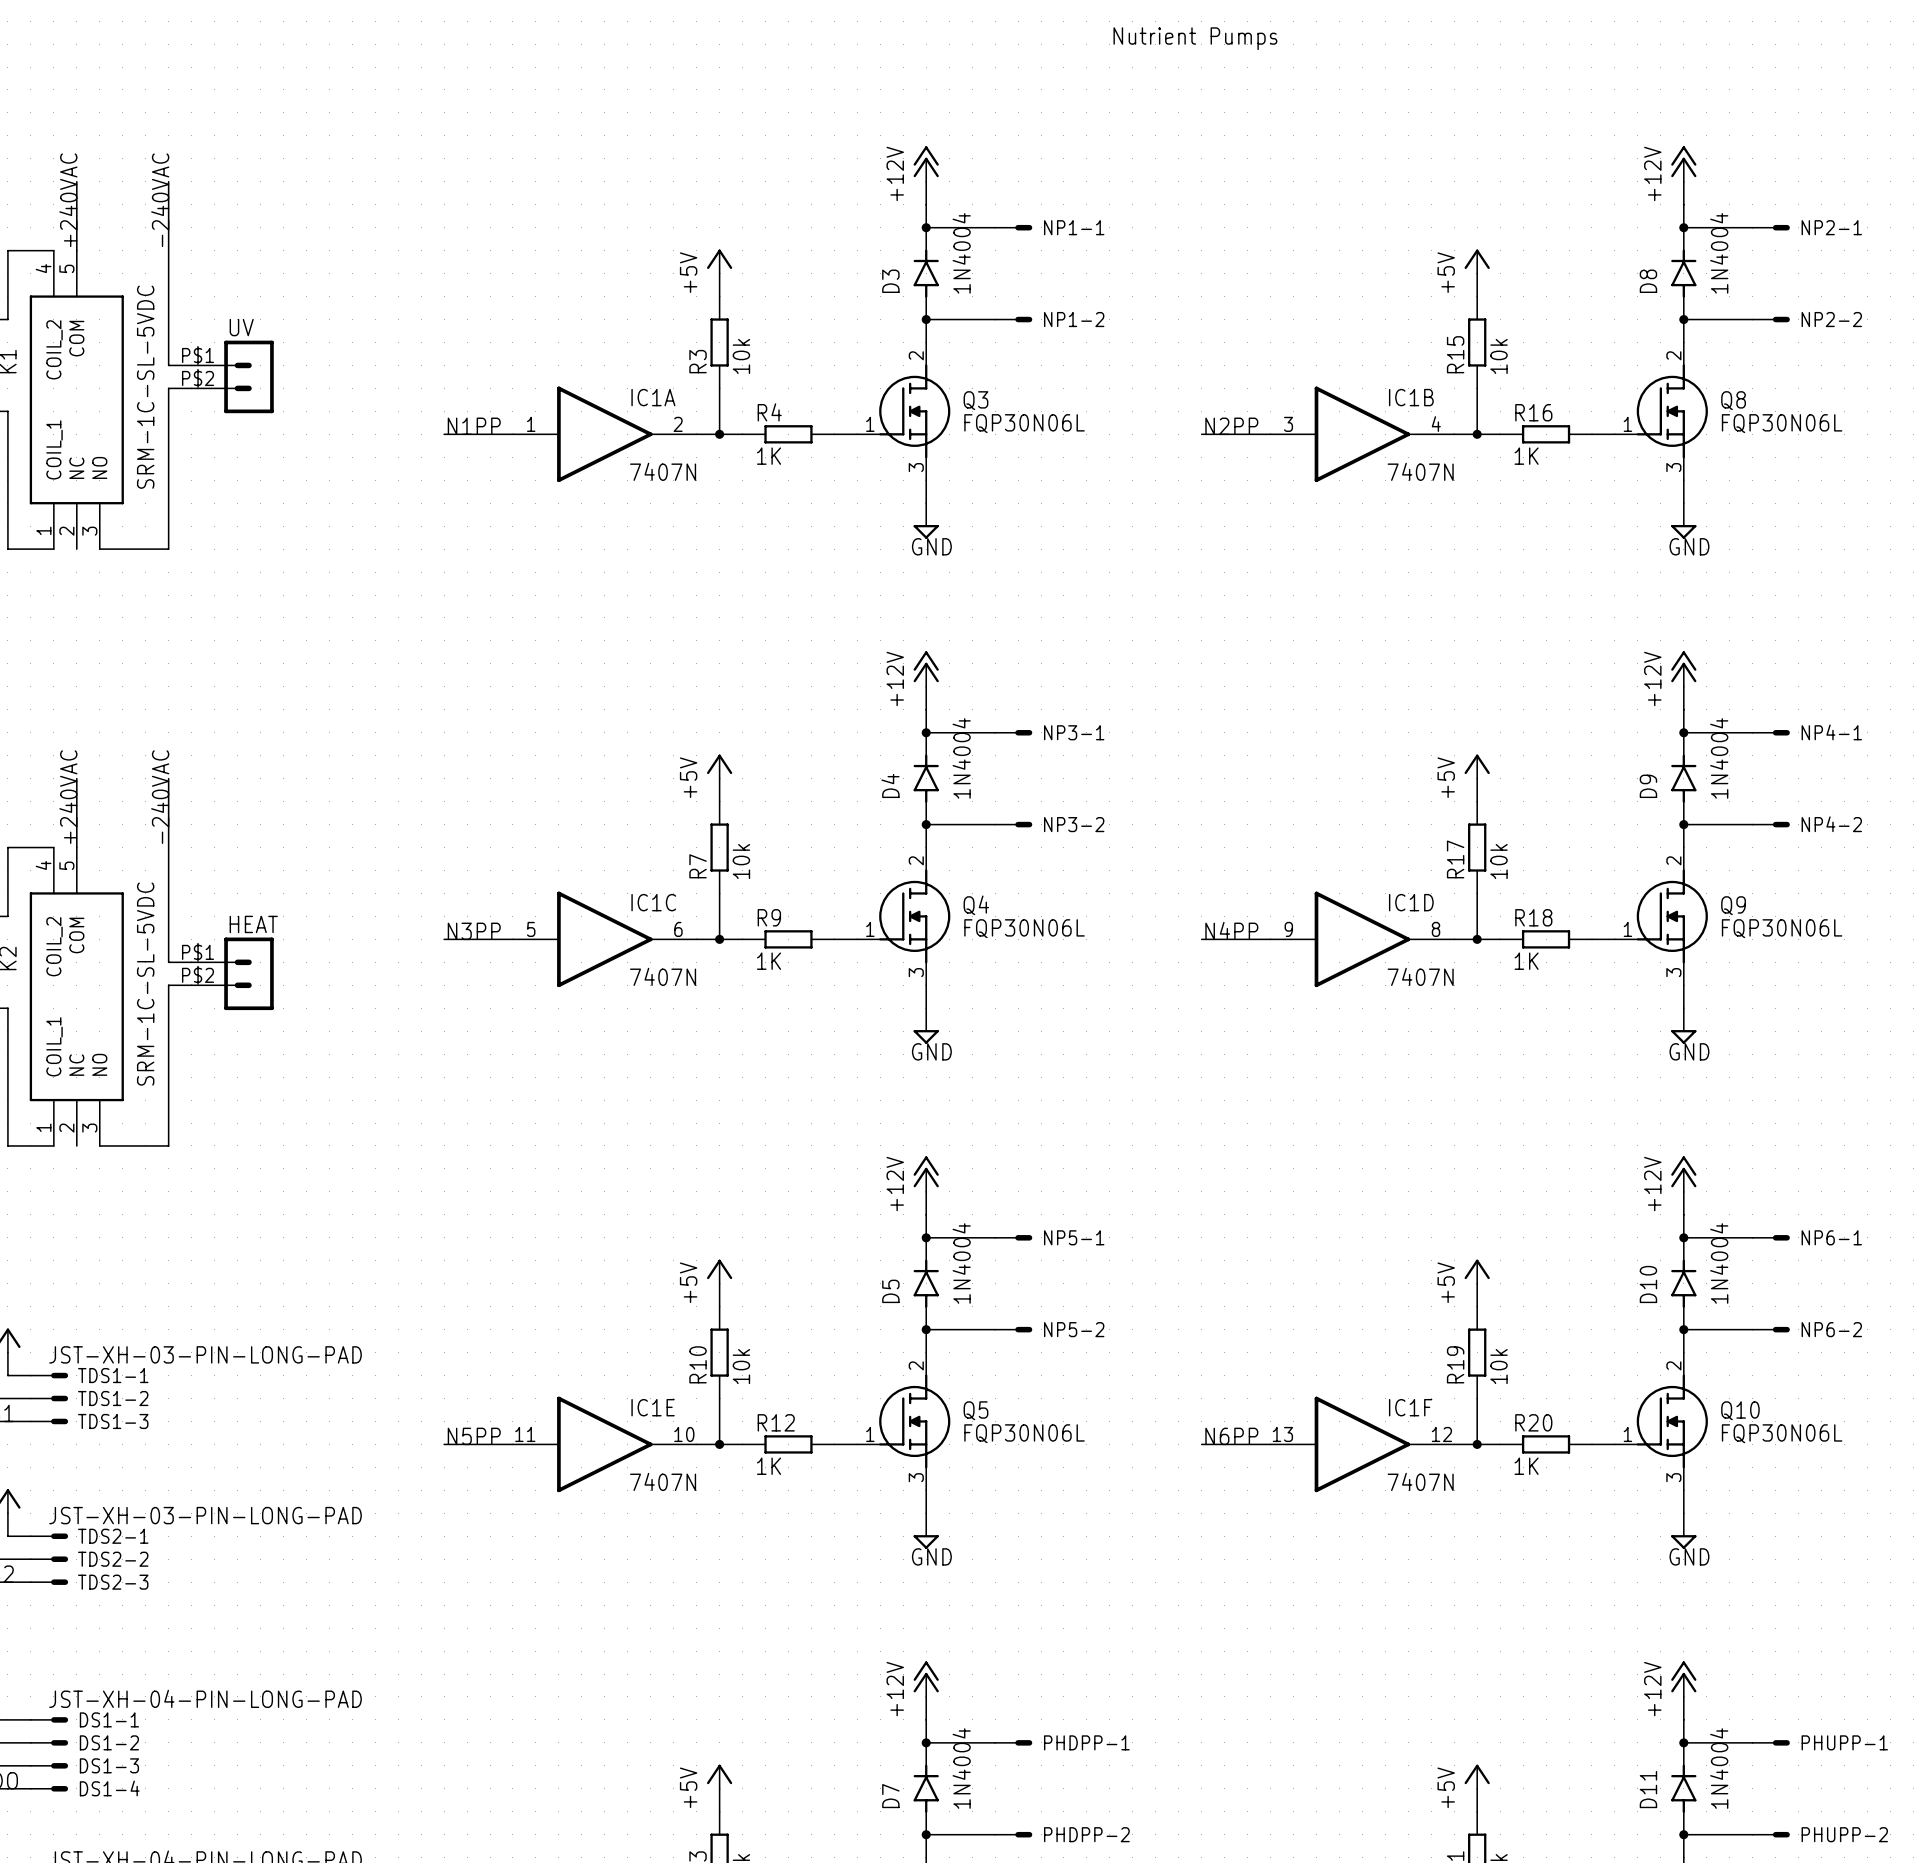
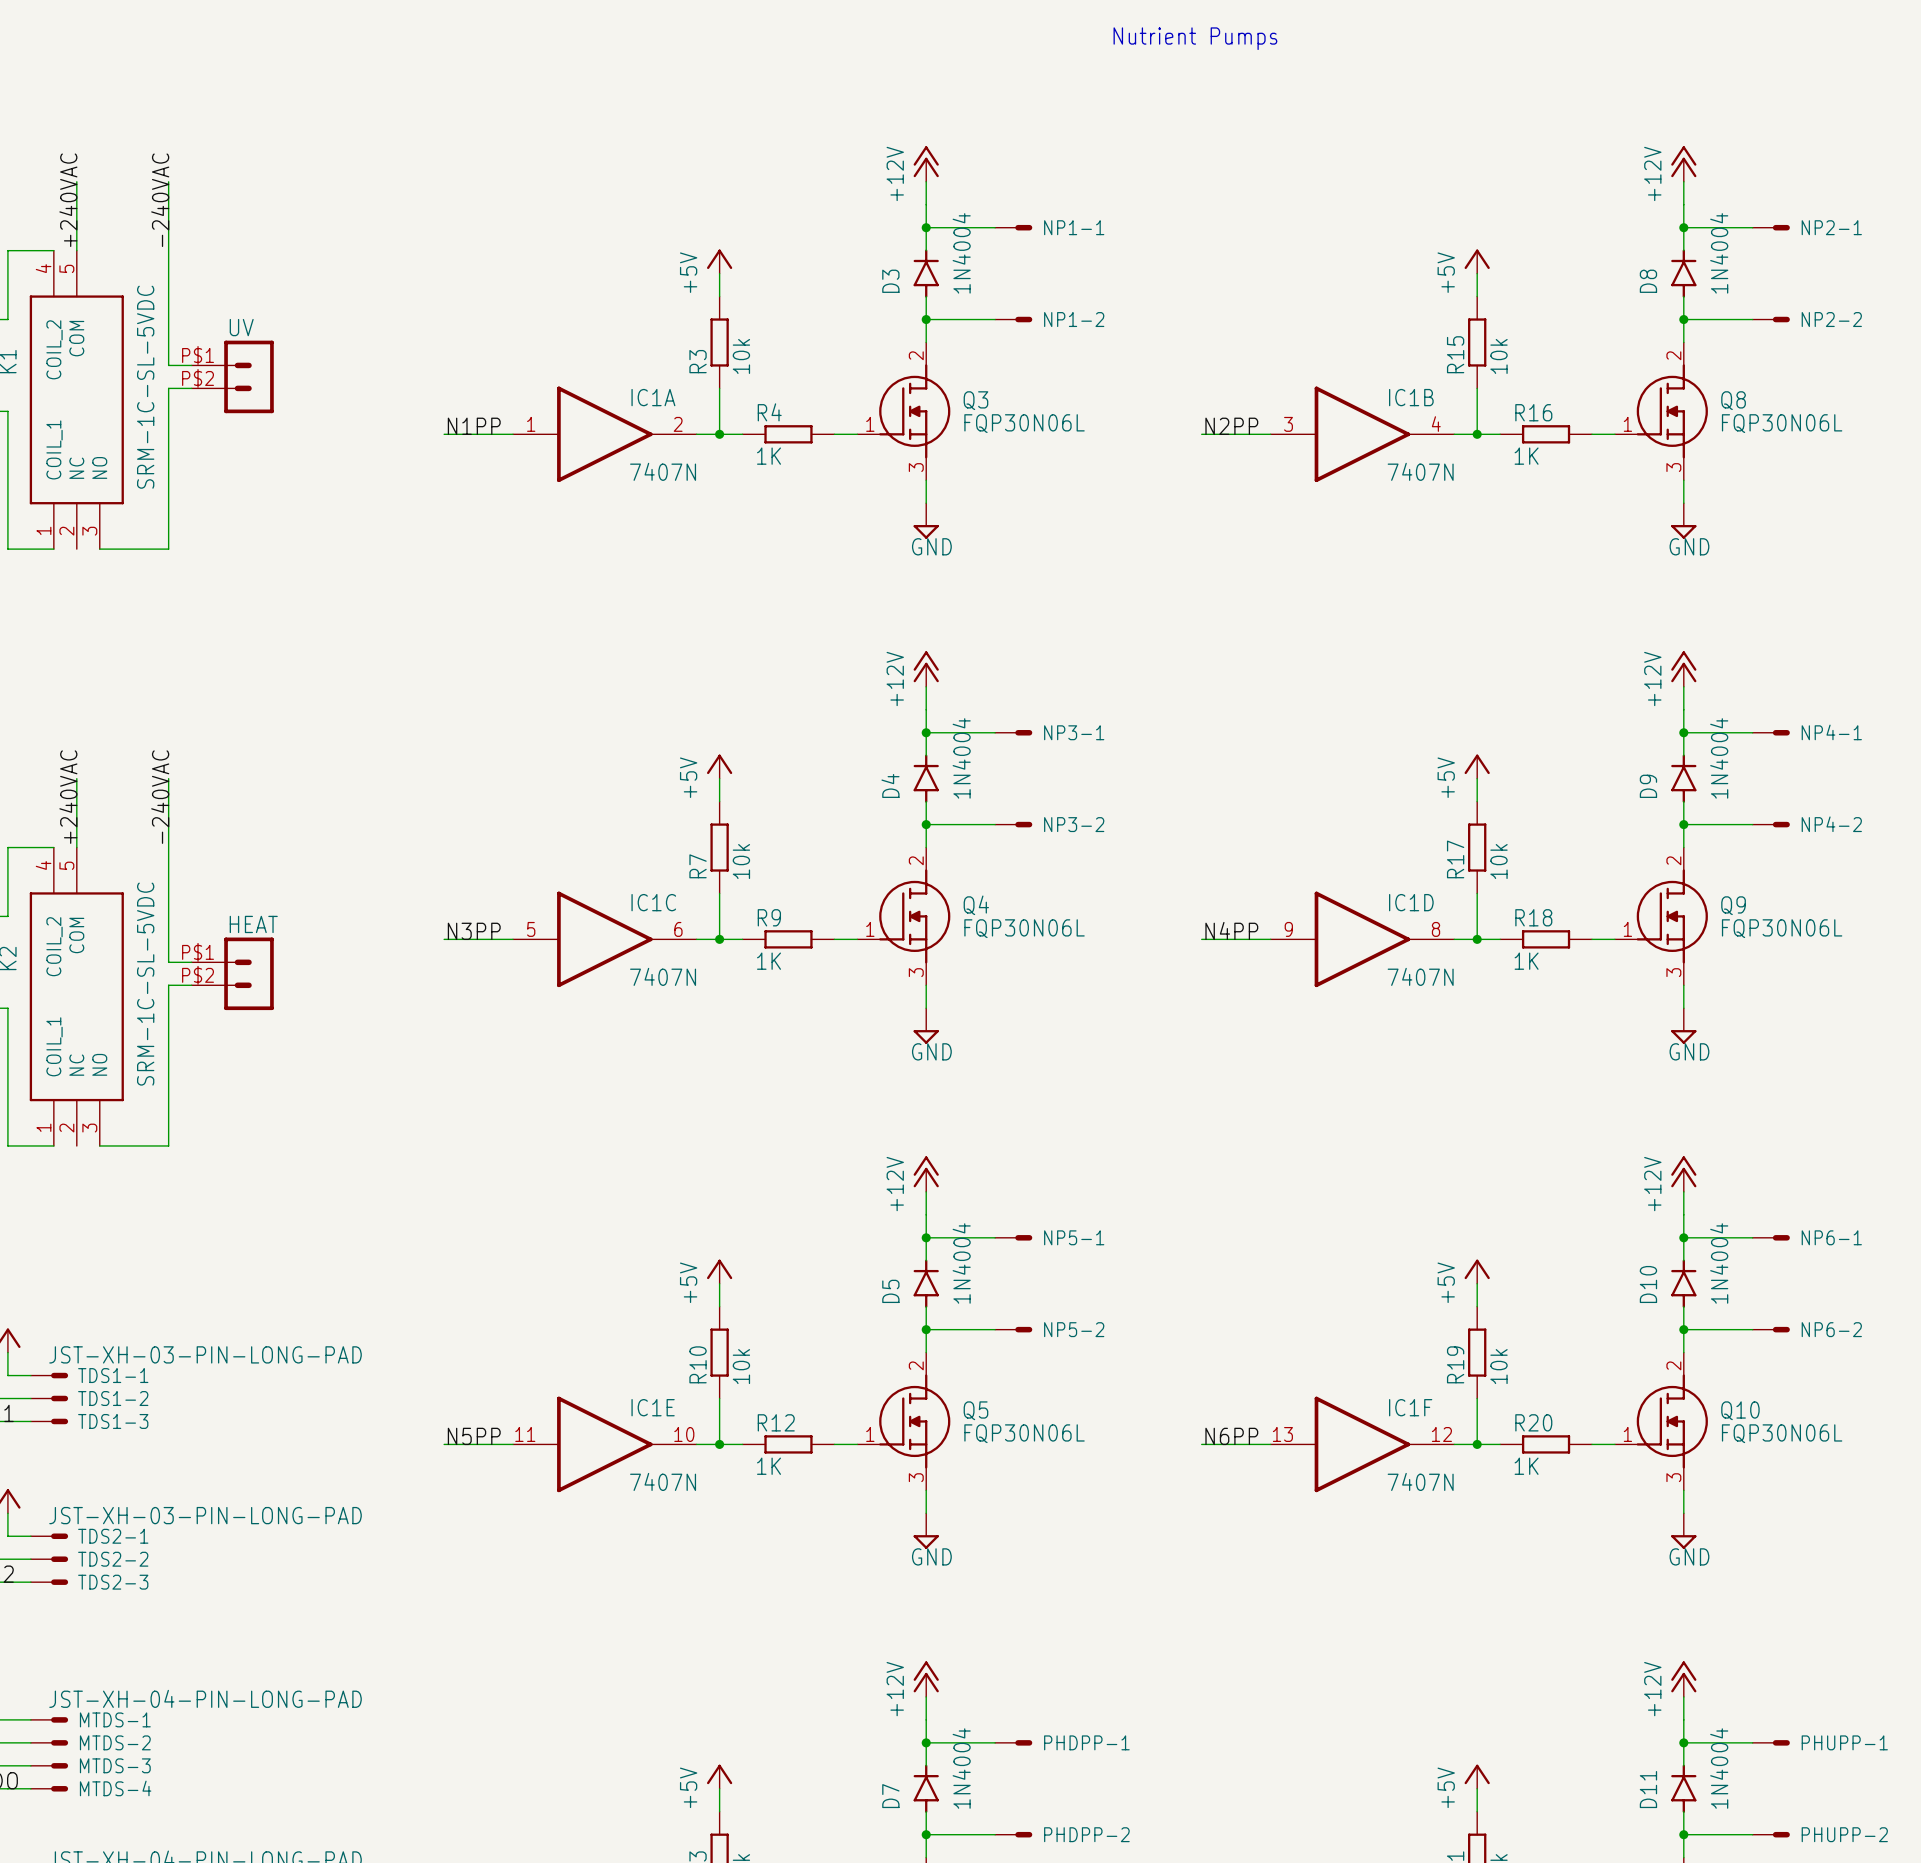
DS1-1 name: DS1-1 (109, 1719) -> MTDS-1 (115, 1719)
DS1-2 name: DS1-2 (109, 1742) -> MTDS-2 (115, 1742)
DS1-3 name: DS1-3 (109, 1765) -> MTDS-3 (115, 1765)
DS1-4 name: DS1-4 (109, 1788) -> MTDS-4 (115, 1788)

